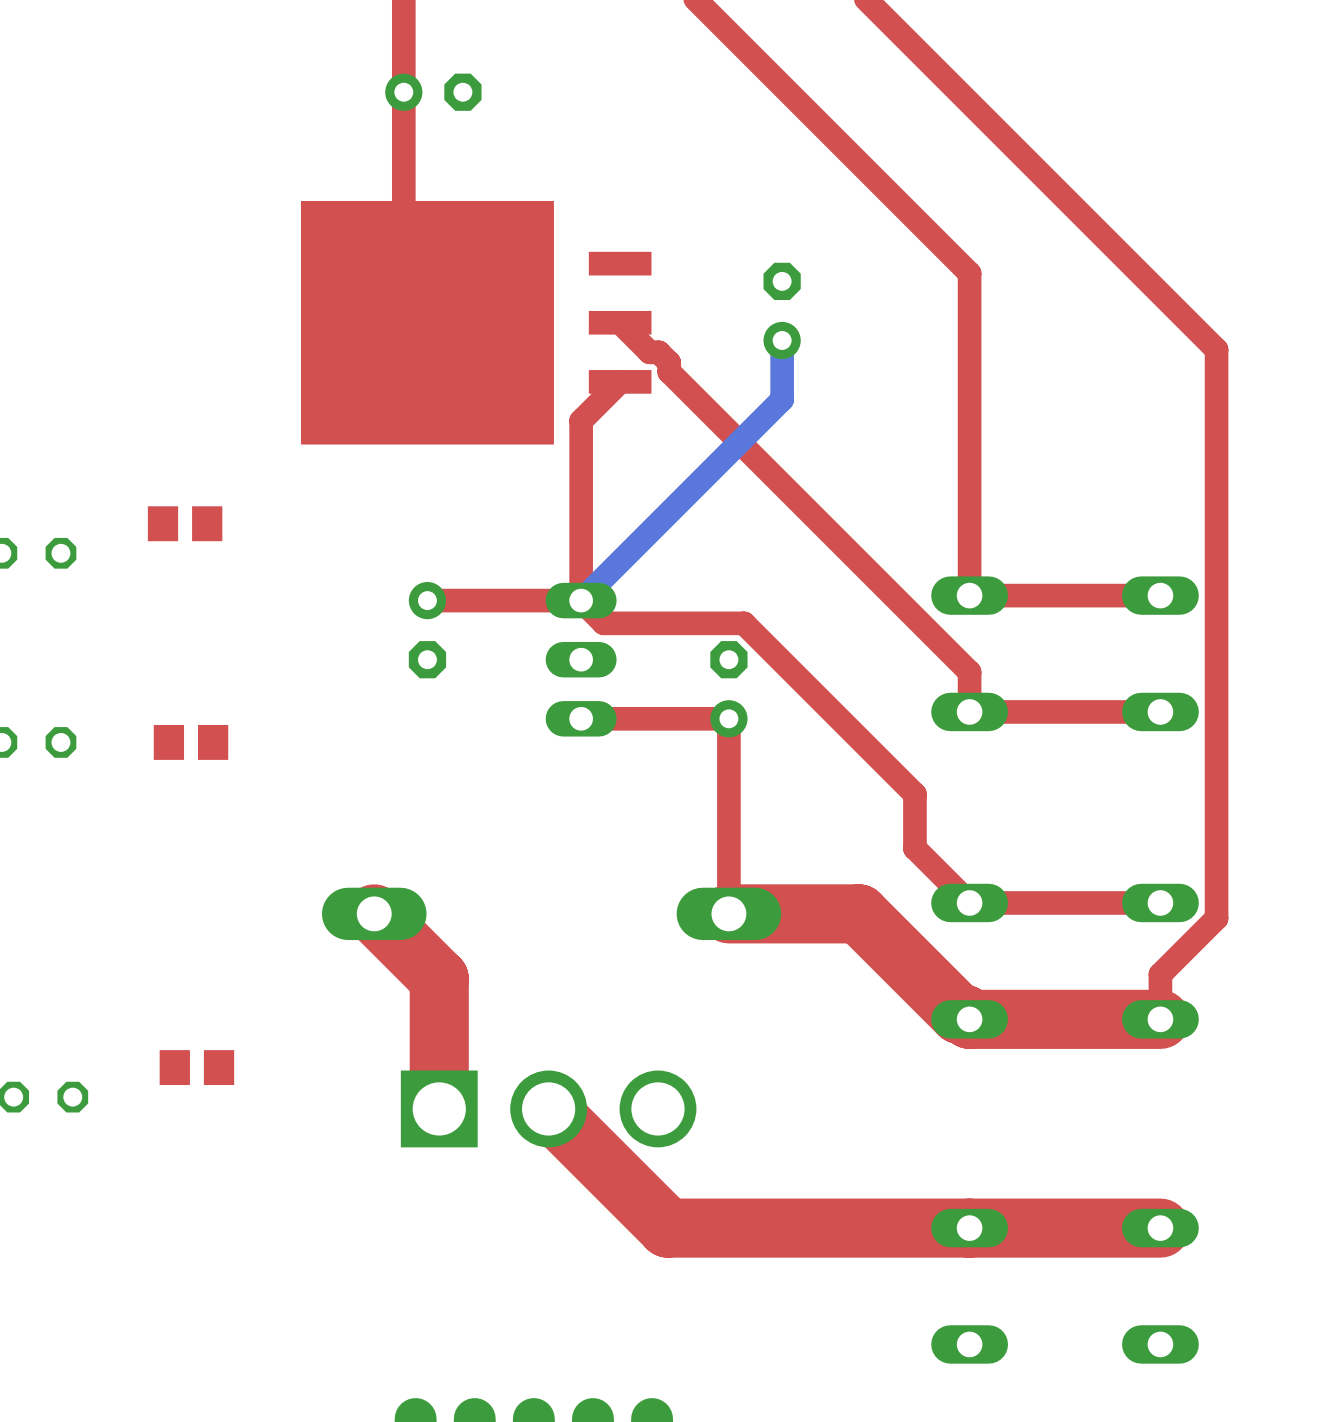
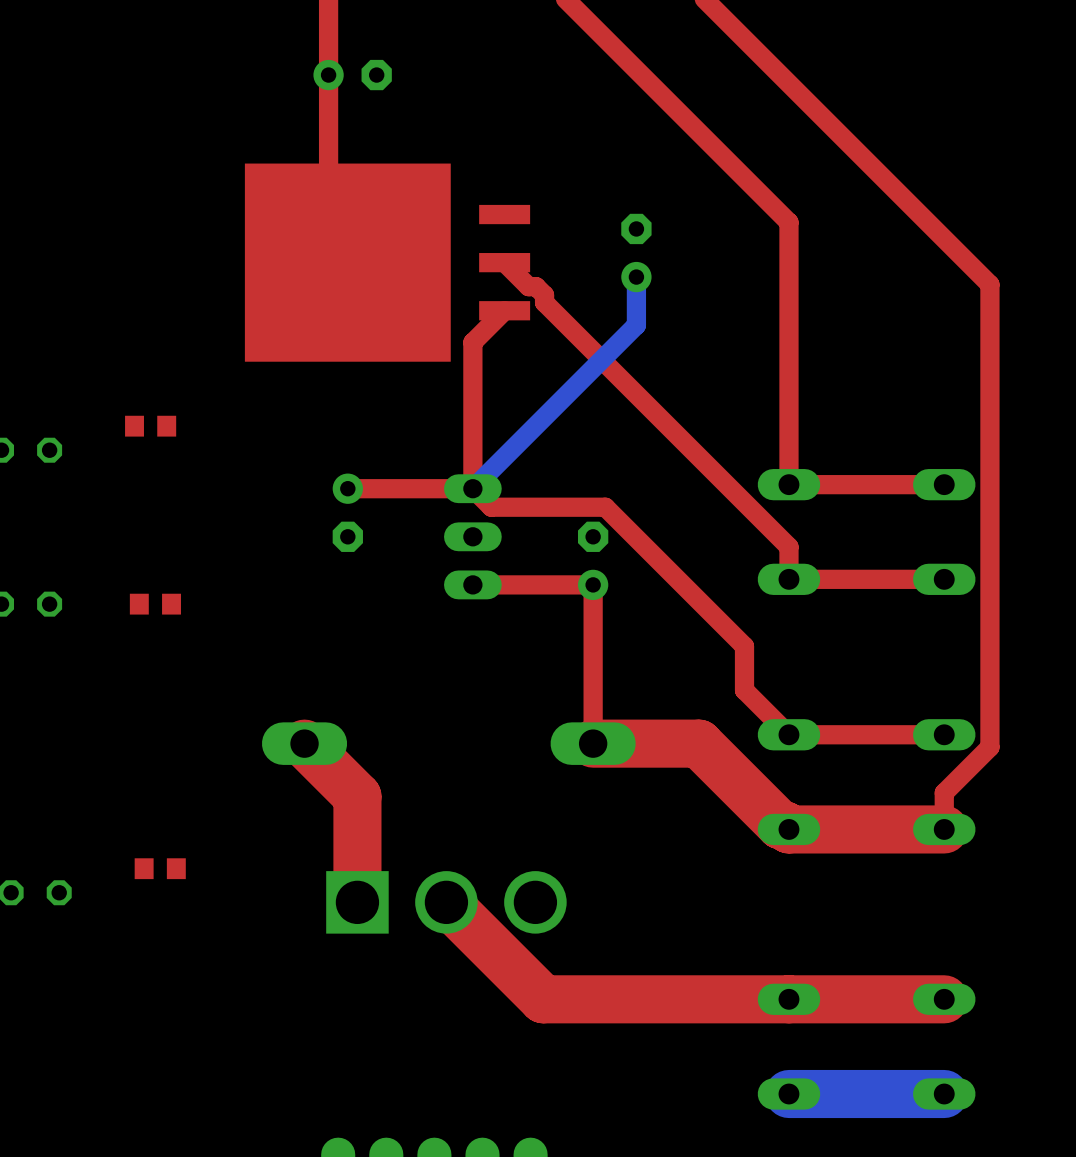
part footprint: [147, 506, 223, 542] -> [125, 415, 177, 437]
part footprint: [153, 725, 229, 760] -> [129, 593, 181, 615]
part footprint: [159, 1050, 235, 1086] -> [134, 858, 186, 880]
bottom track: none -> (944, 1094) (788, 1094)

